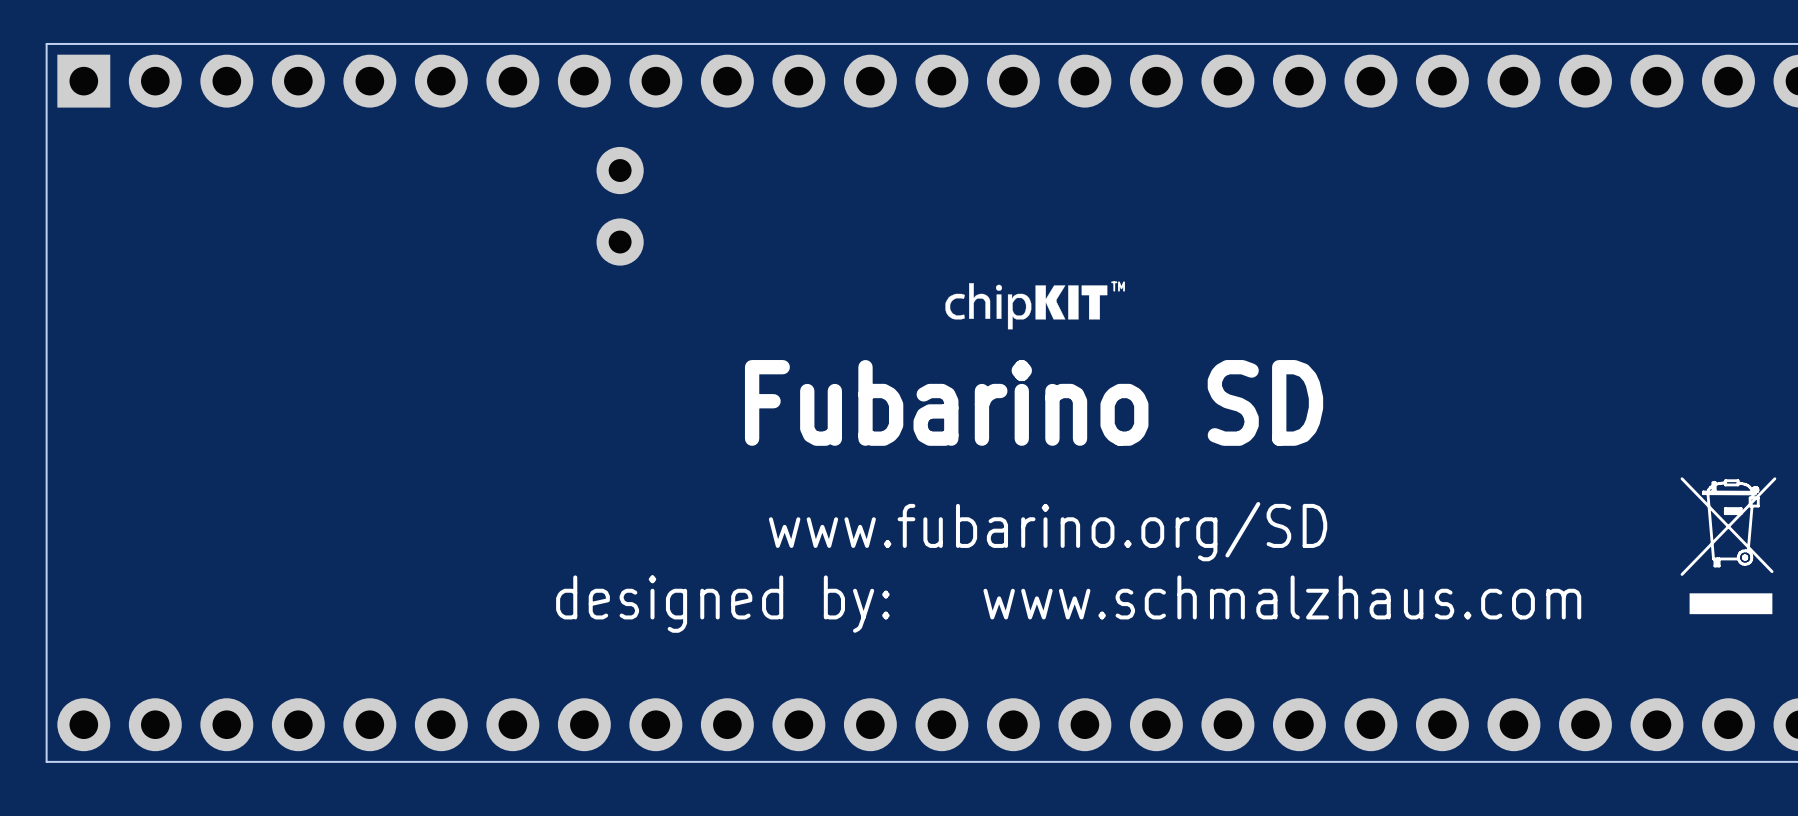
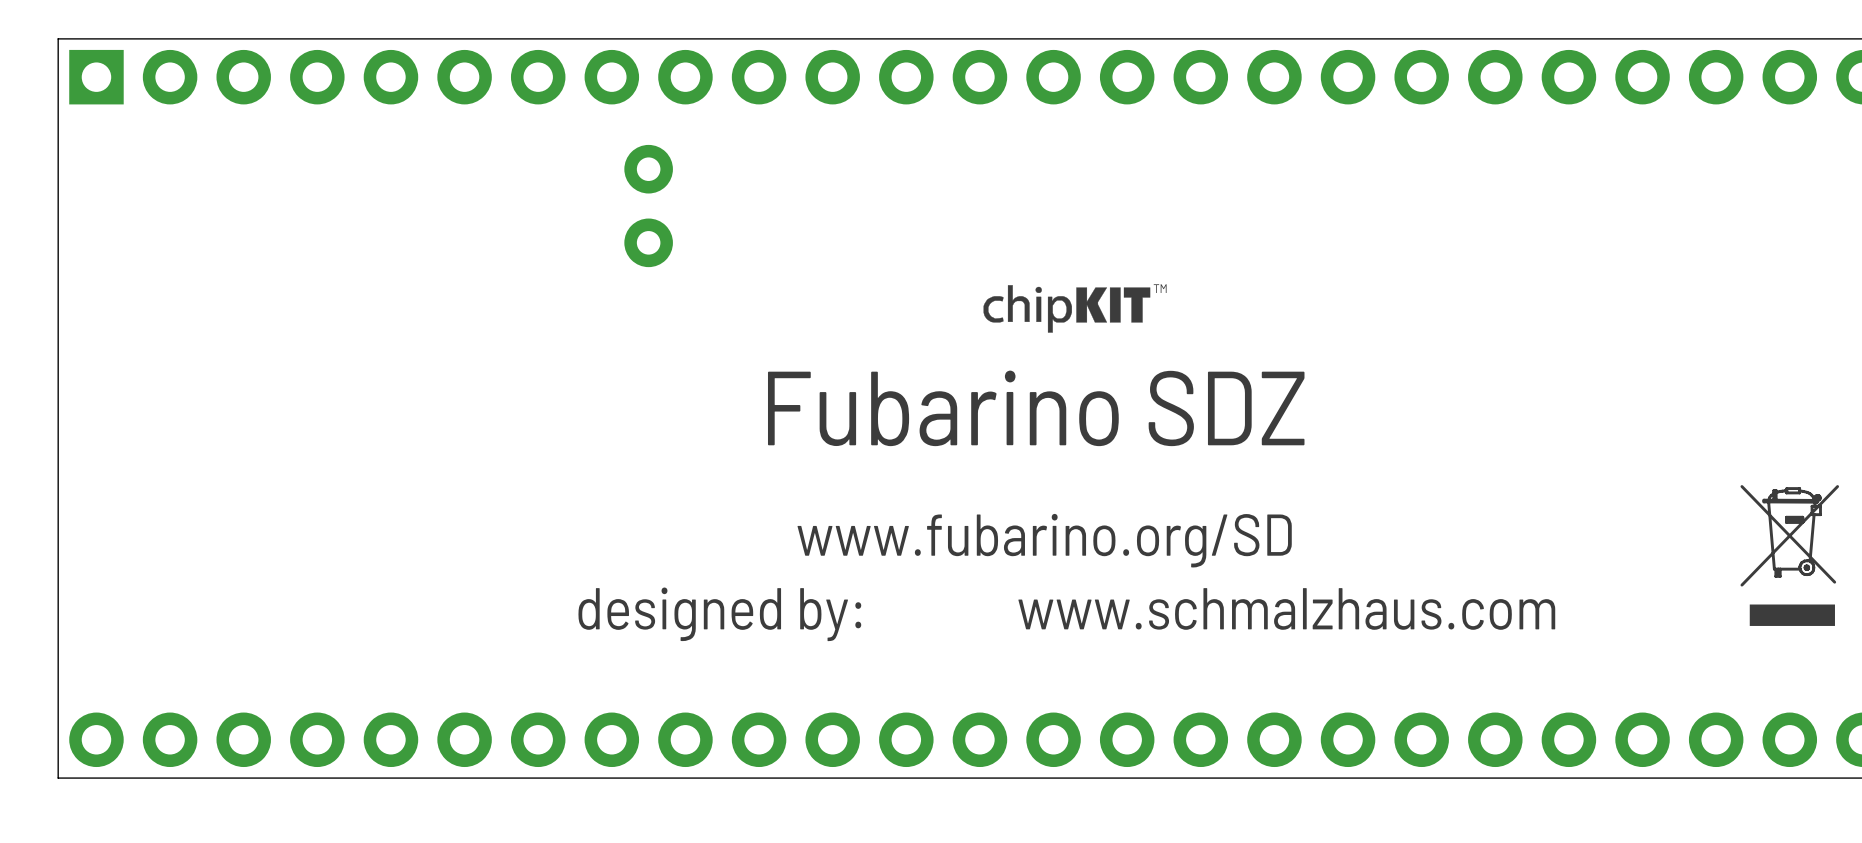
text: Fubarino SD (1034, 402) -> Fubarino SDZ (1036, 408)

